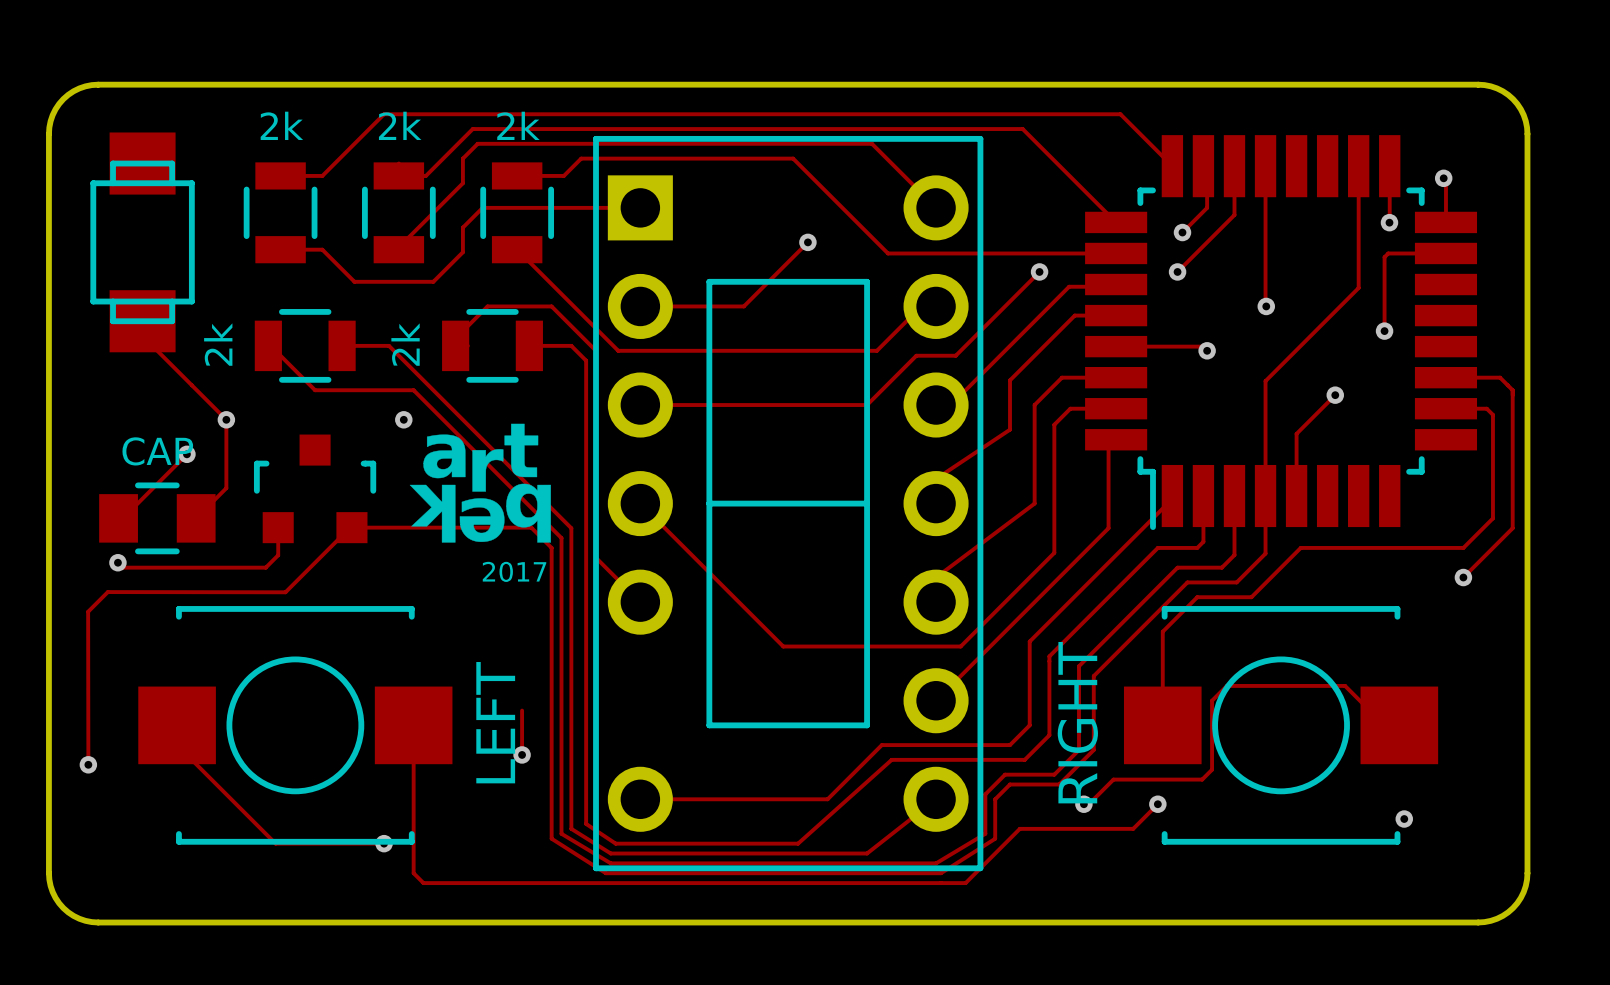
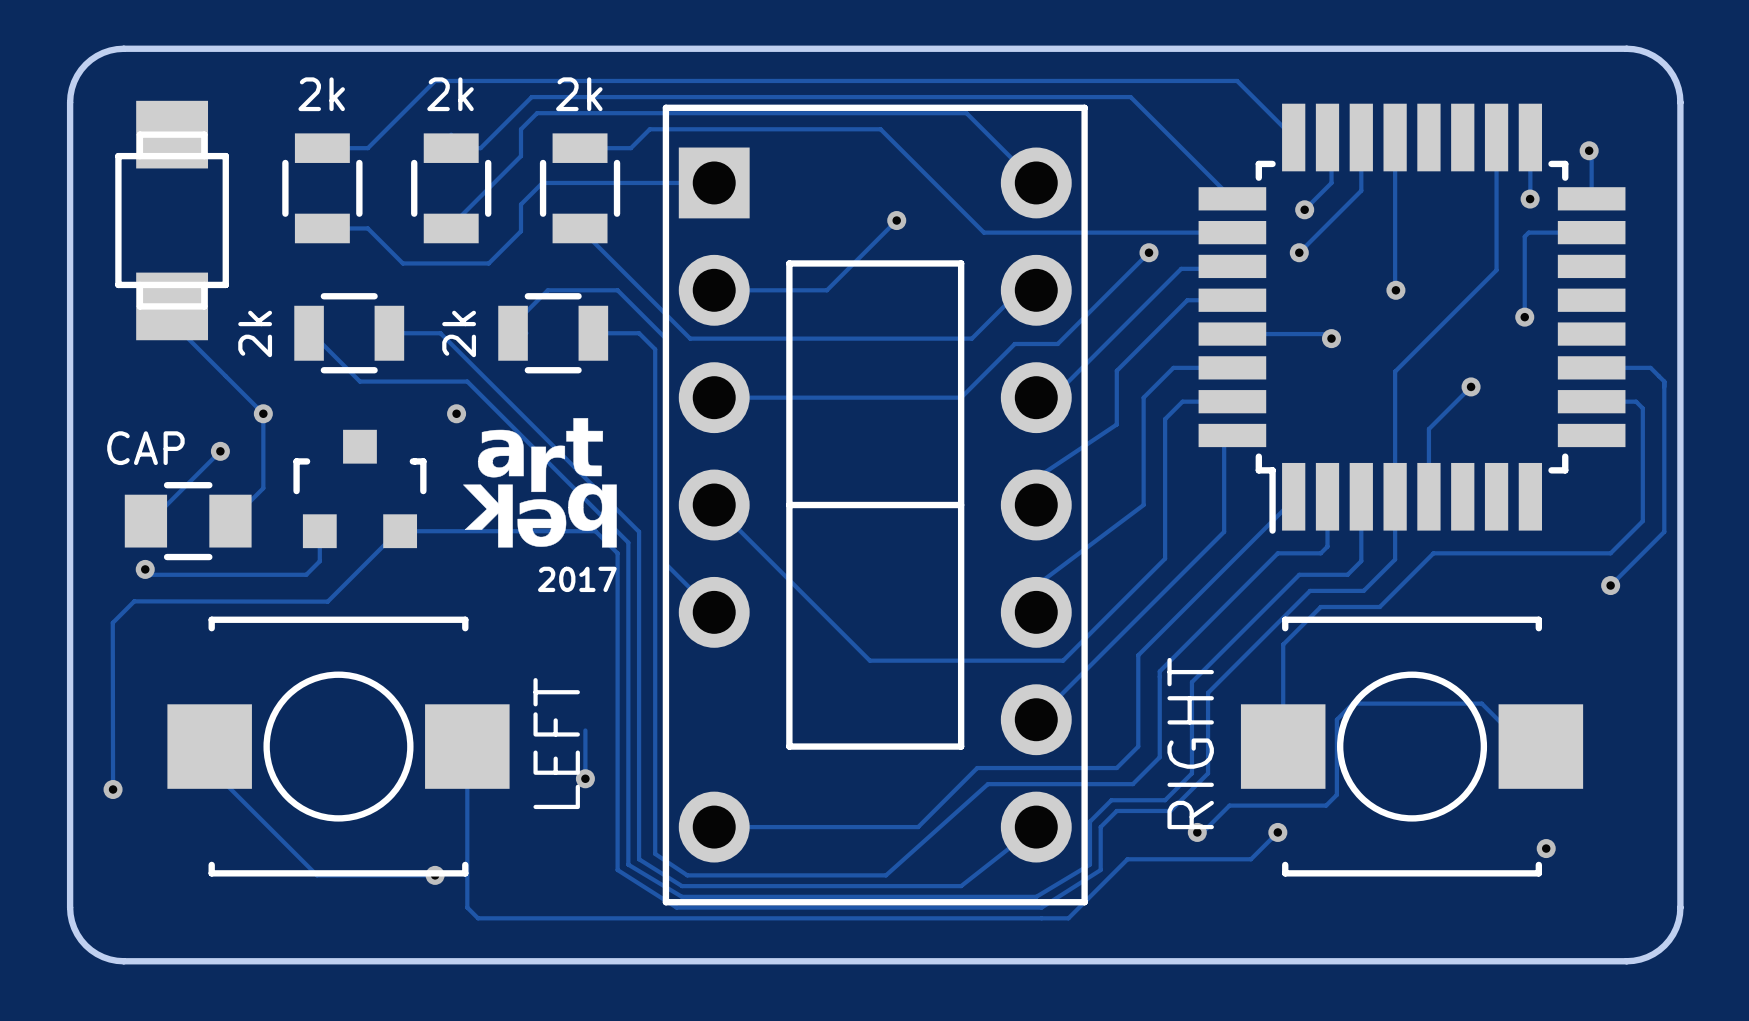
CAP name position: CAP (157, 451) -> CAP (145, 448)

